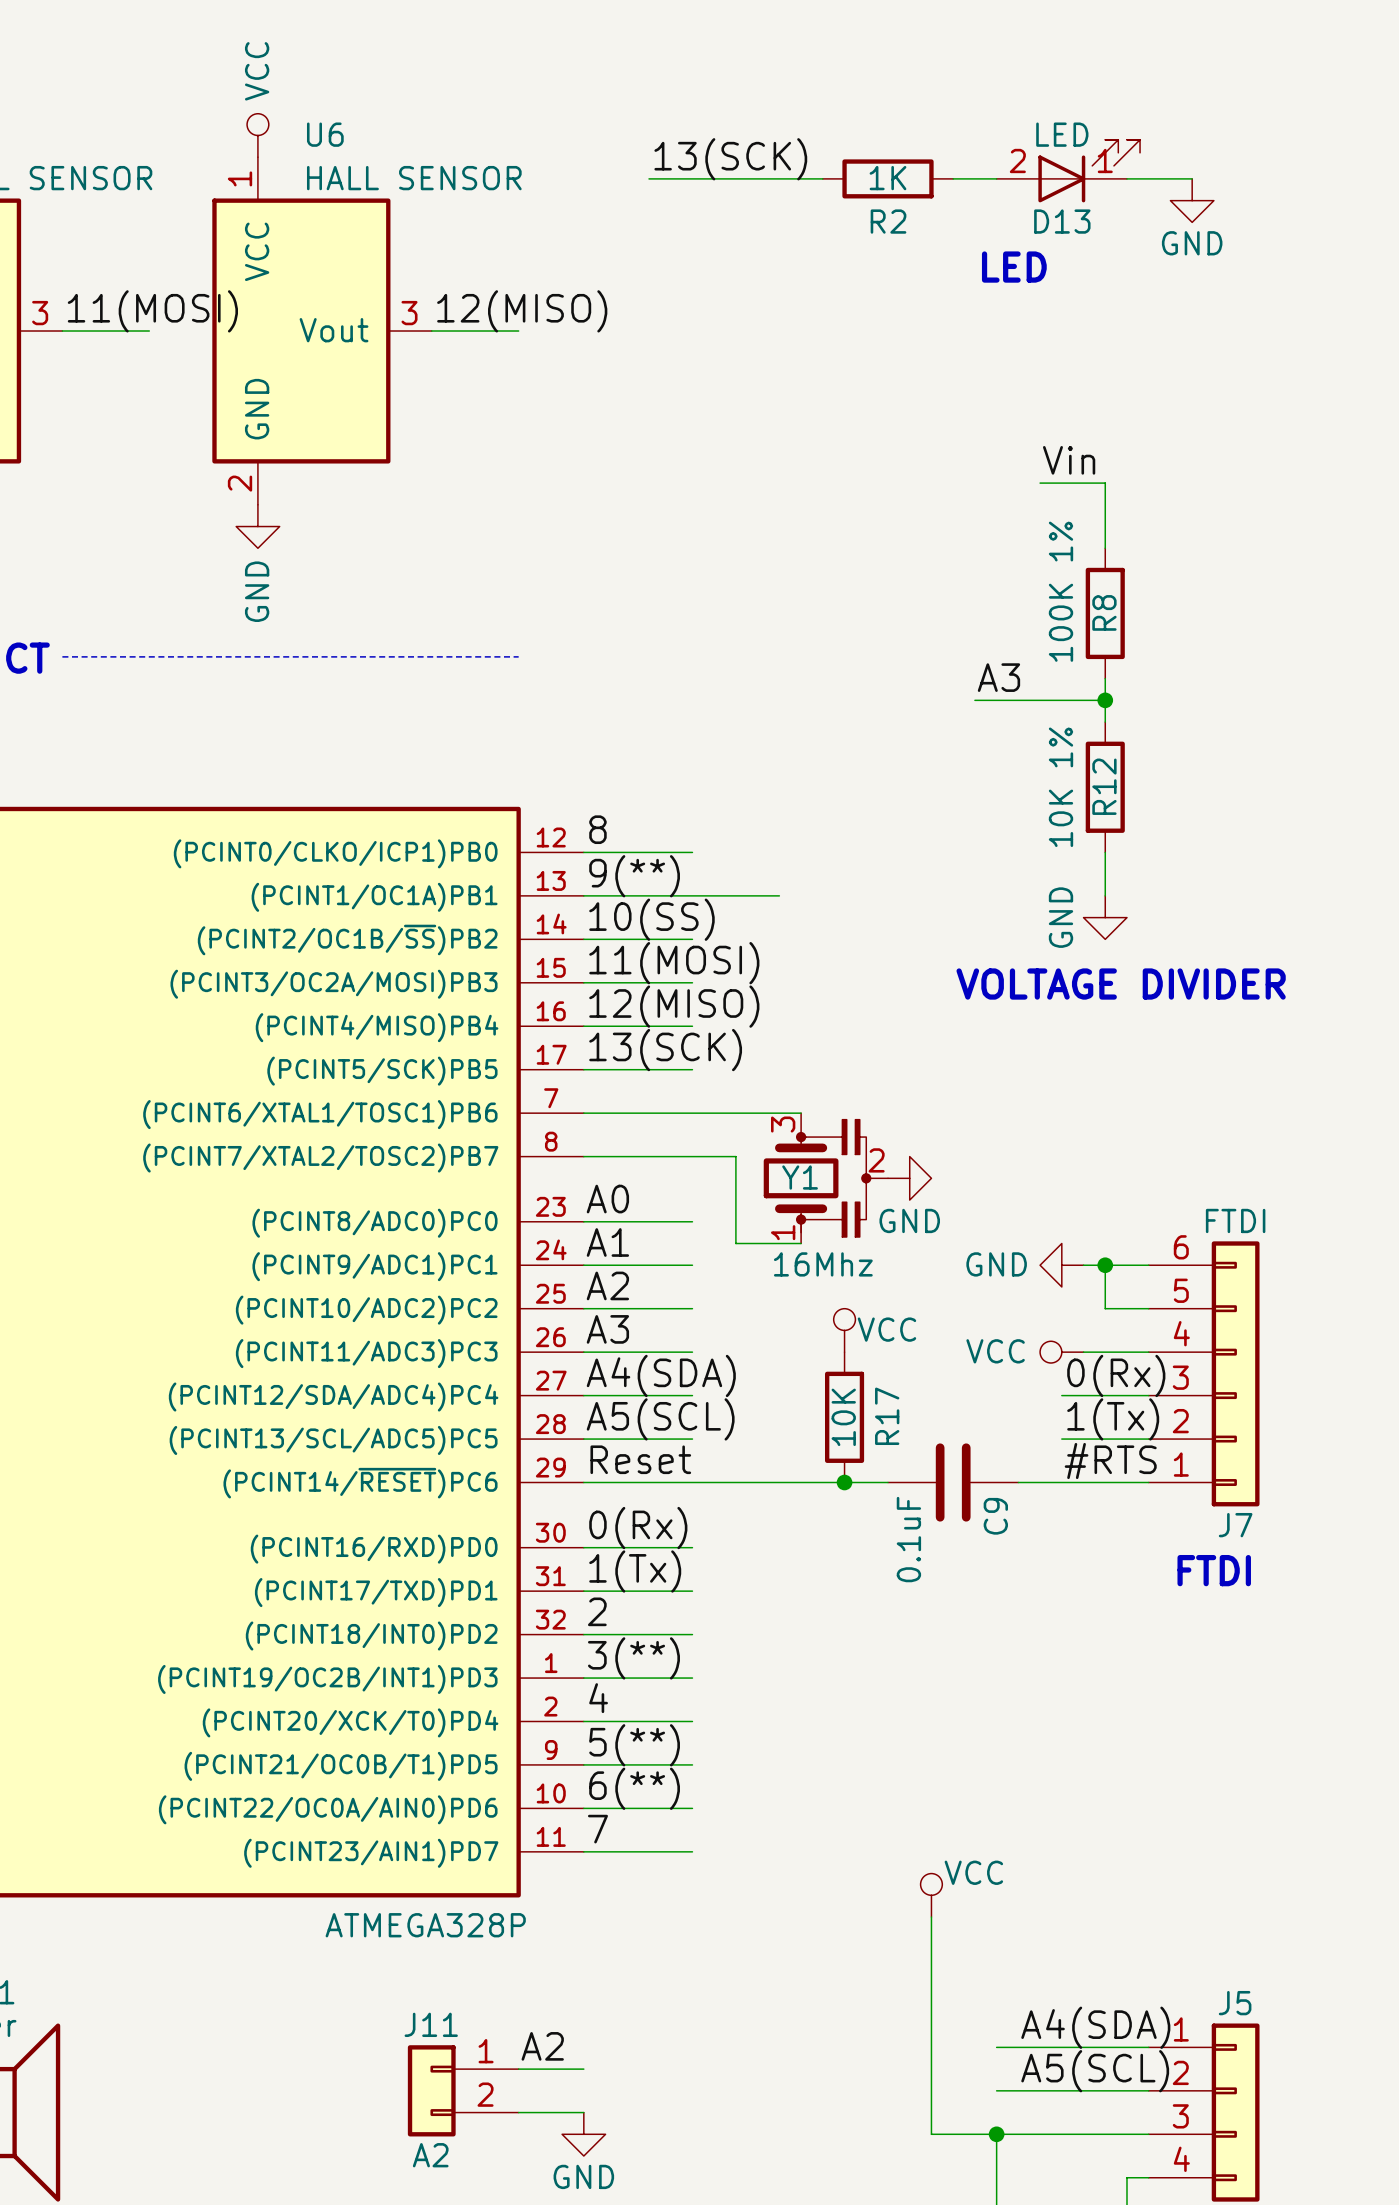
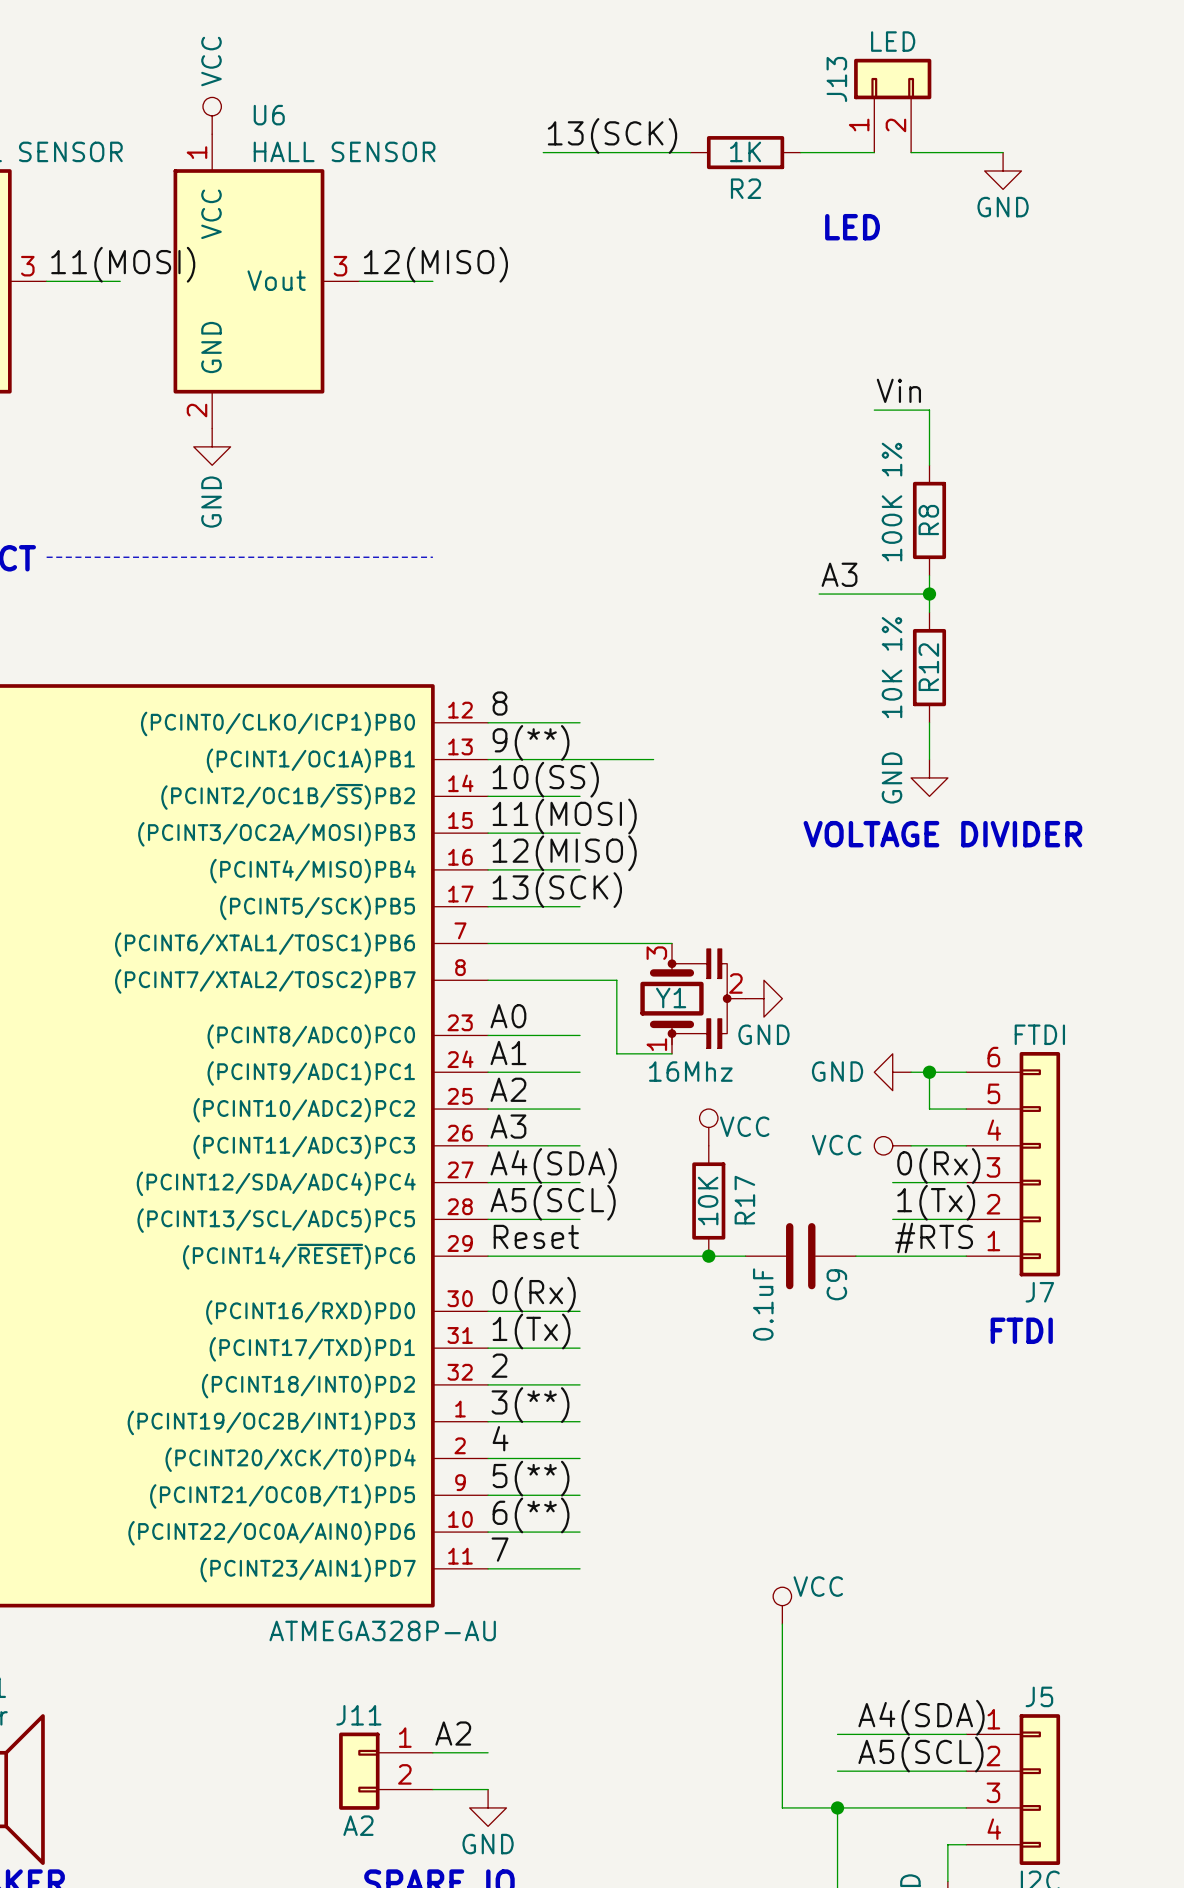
J13: none -> LED (892, 105)
D13: LED (1068, 171) -> none
part value: ATMEGA328P (425, 1925) -> ATMEGA328P-AU (382, 1630)

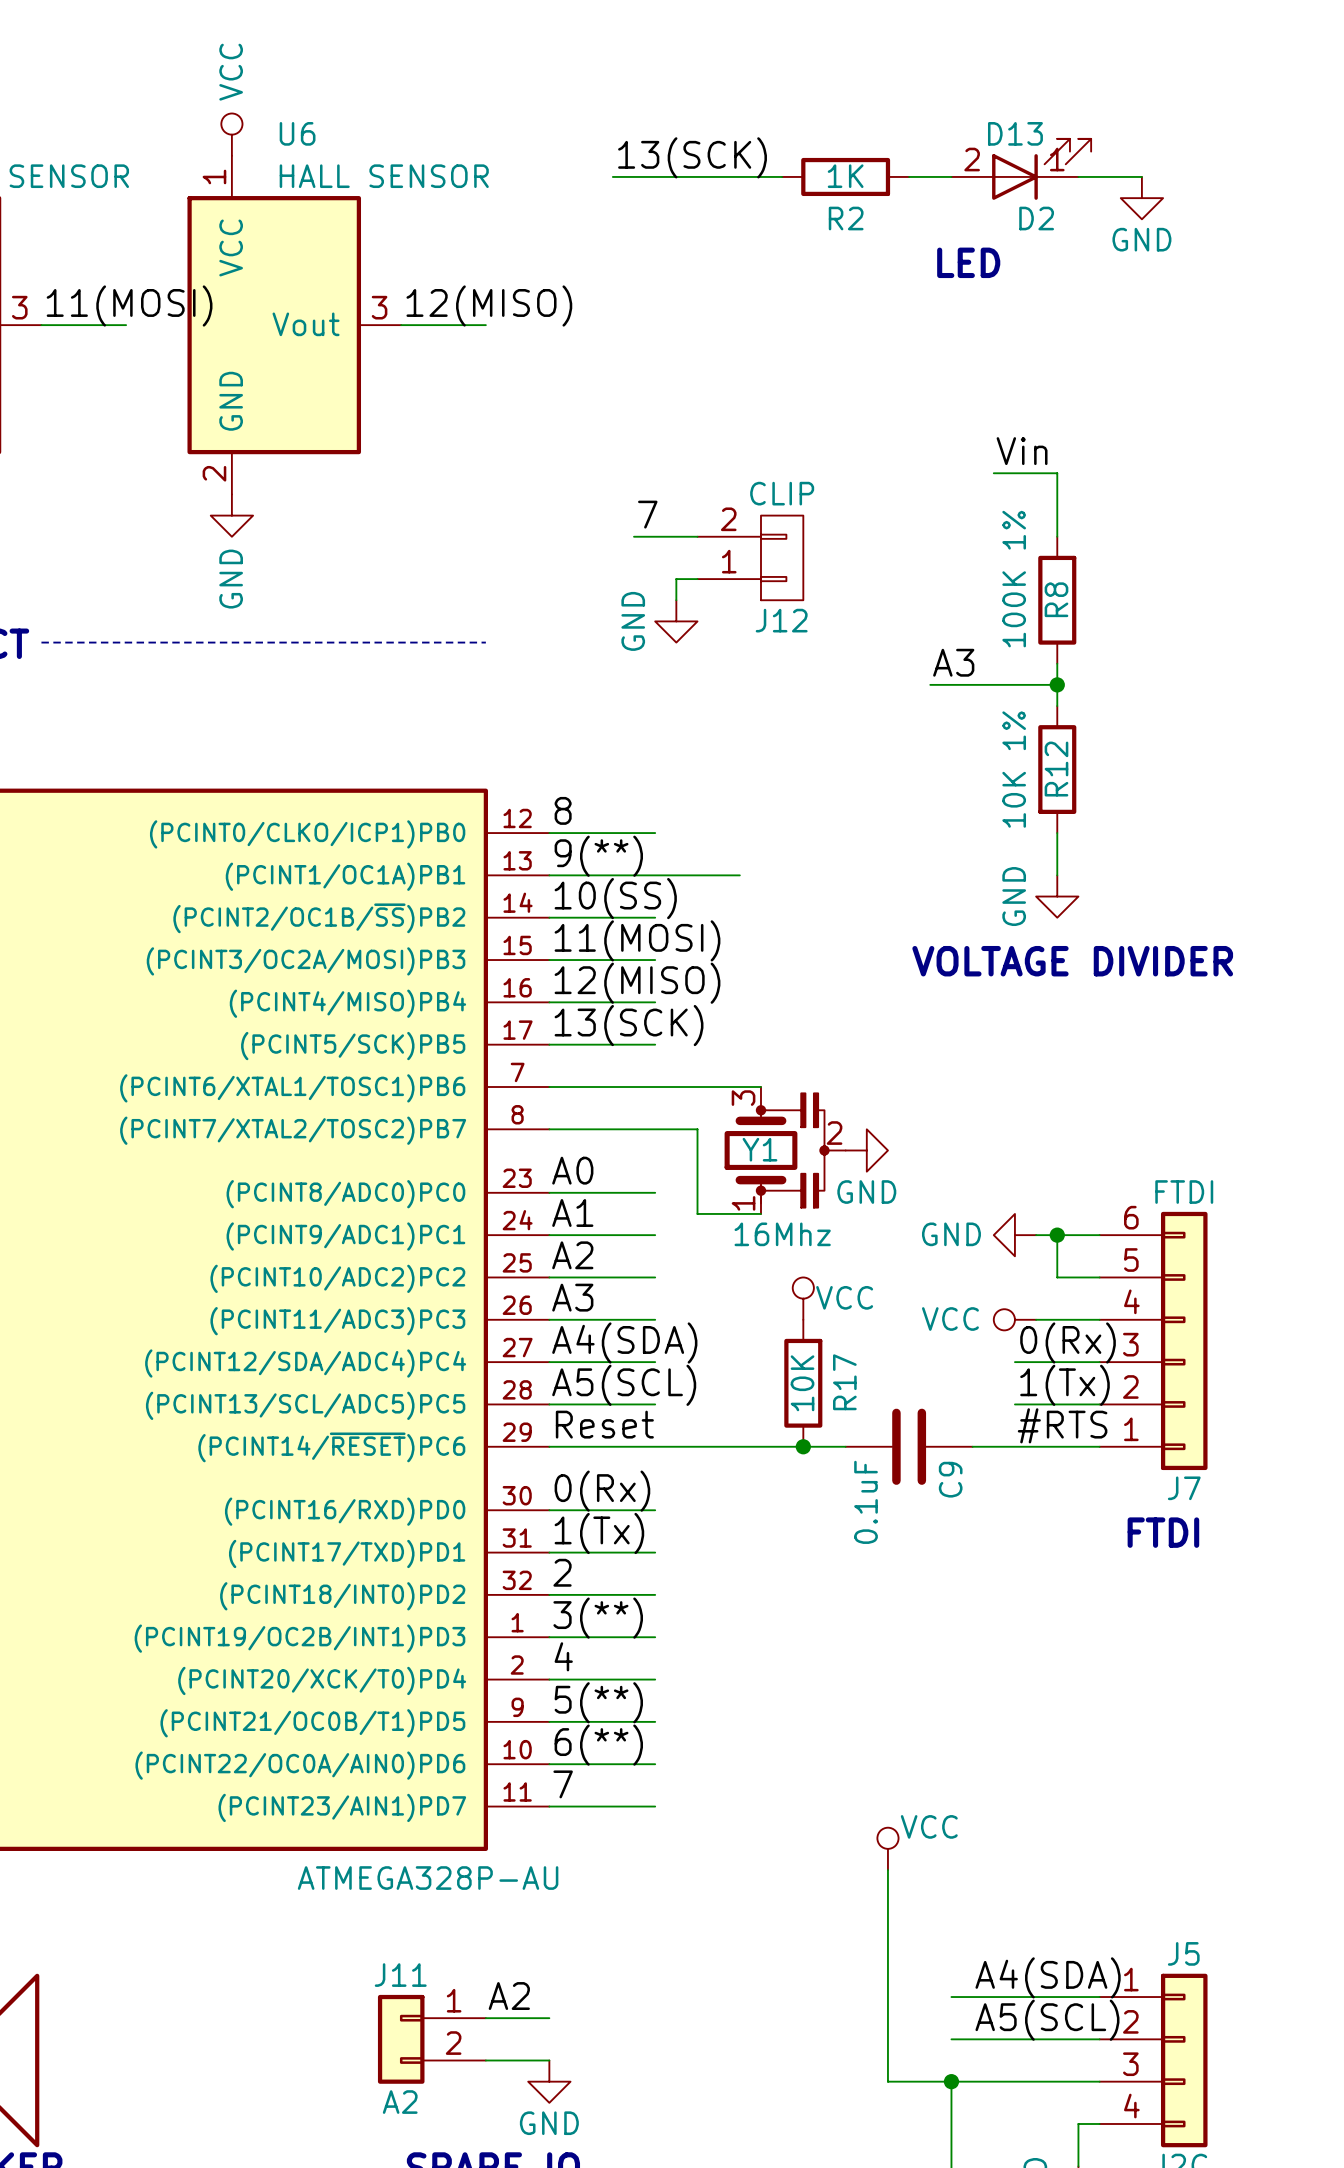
J13: LED (892, 105) -> none
D2: none -> D13 (1021, 169)
label: none -> 7 (647, 514)
wire: none -> (634, 536) (697, 536)
J12: none -> CLIP (750, 557)
wire: none -> (697, 579) (676, 579) (676, 600)
power symbol: none -> GND (676, 621)

